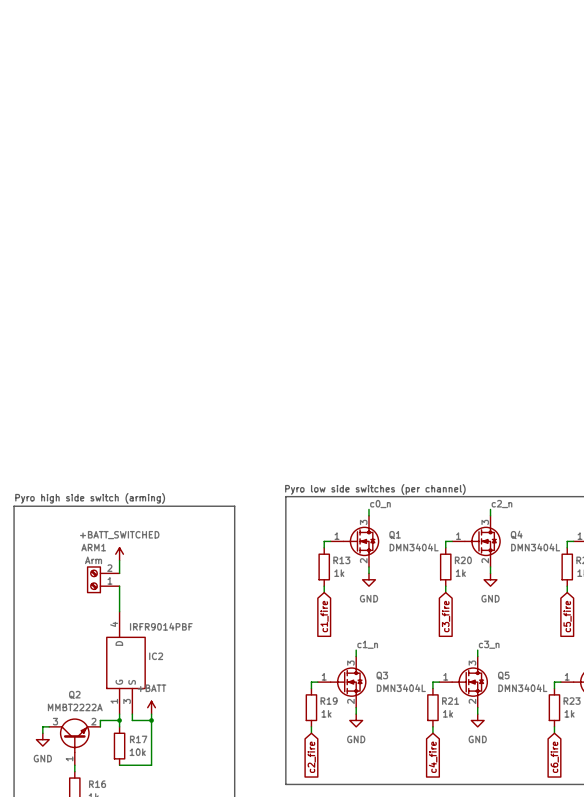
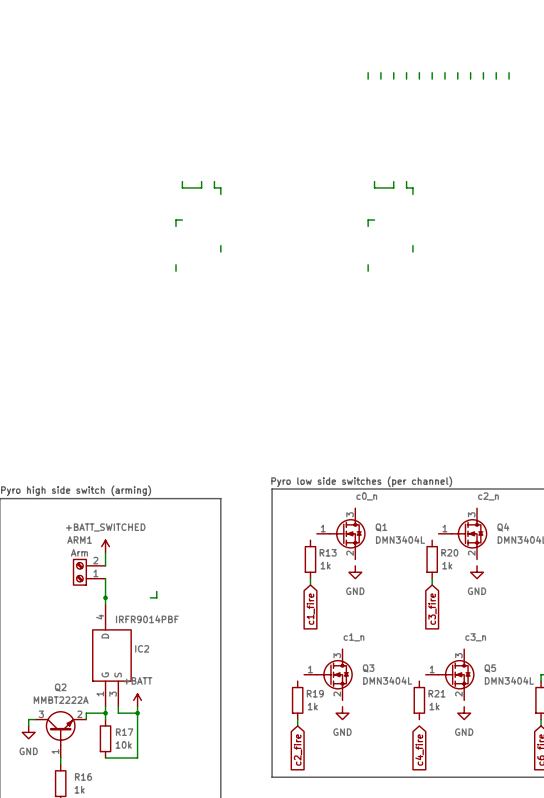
wire: none -> (368, 72) (368, 79)
wire: none -> (380, 72) (380, 79)
wire: none -> (393, 72) (393, 79)
wire: none -> (406, 72) (406, 79)
wire: none -> (419, 72) (419, 79)
wire: none -> (432, 72) (432, 79)
wire: none -> (444, 72) (444, 79)
wire: none -> (457, 72) (457, 79)
wire: none -> (470, 72) (470, 79)
wire: none -> (483, 72) (483, 79)
wire: none -> (496, 72) (496, 79)
wire: none -> (509, 72) (509, 79)
wire: none -> (182, 181) (182, 187) (201, 187) (201, 181)
wire: none -> (214, 181) (214, 187) (220, 187) (220, 194)
wire: none -> (374, 181) (374, 187) (393, 187) (393, 181)
wire: none -> (406, 181) (406, 187) (412, 187) (412, 194)
wire: none -> (182, 220) (175, 220) (175, 226)
wire: none -> (374, 220) (368, 220) (368, 226)
wire: none -> (220, 245) (220, 252)
wire: none -> (412, 245) (412, 252)
wire: none -> (175, 264) (175, 271)
wire: none -> (368, 264) (368, 271)
wire: (368, 509) (368, 515) -> none
wire: (490, 509) (490, 515) -> none
wire: (330, 541) (324, 541) (324, 547) -> none
wire: (452, 541) (445, 541) (445, 547) -> none
wire: (368, 566) (368, 573) -> none
wire: (490, 566) (490, 573) -> none
wire: none -> (156, 591) (156, 597) (150, 597)
junction: none -> (105, 597)
wire: (356, 650) (356, 656) -> none
wire: (477, 650) (477, 656) -> none
wire: (317, 682) (311, 682) (311, 688) -> none
wire: (439, 682) (432, 682) (432, 688) -> none
wire: (356, 707) (356, 714) -> none
wire: (477, 707) (477, 714) -> none
wire: (432, 726) (432, 733) -> none

